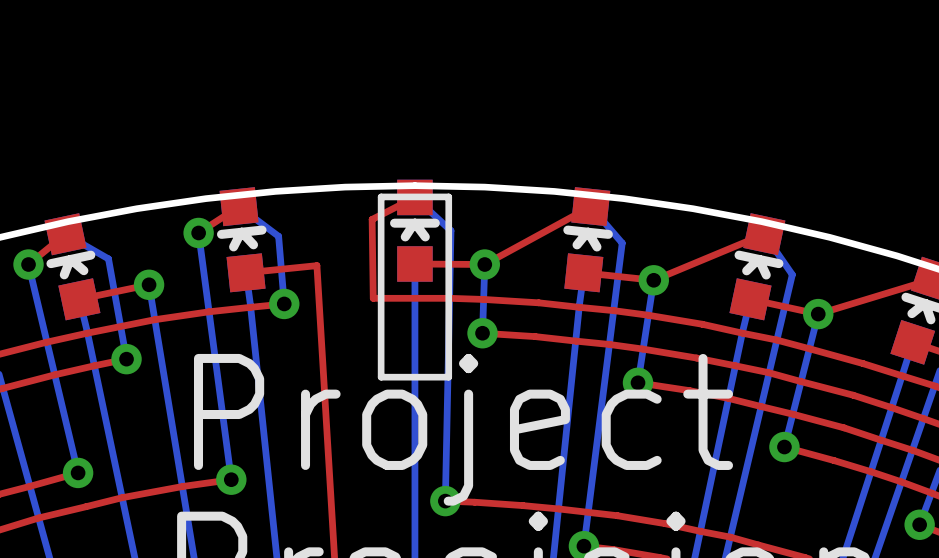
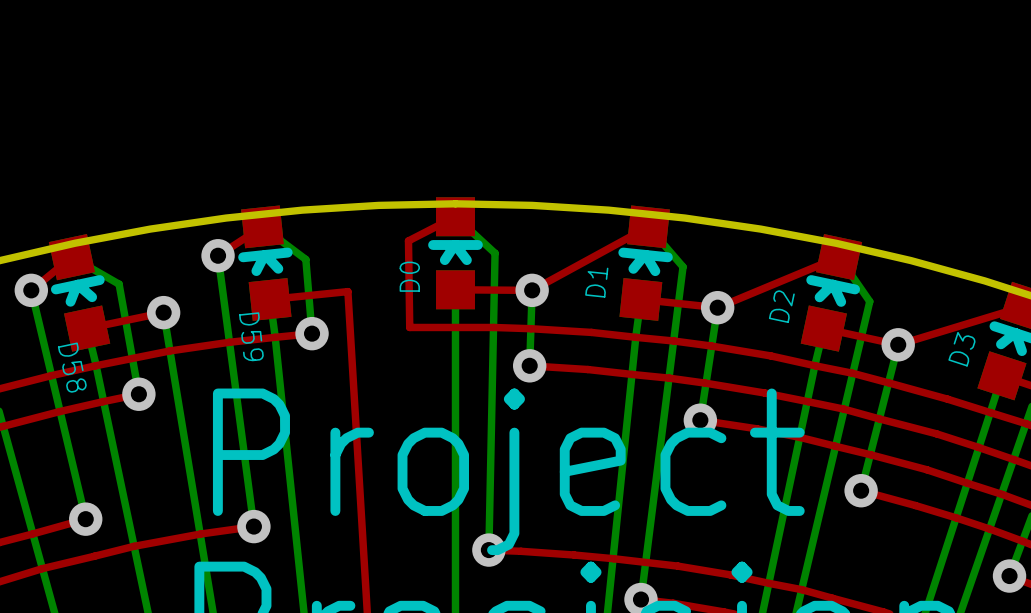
line: (381, 196) (448, 196) (448, 377) (381, 377) (381, 196) -> none
D0 name: none -> D0 (409, 276)
D1 name: none -> D1 (596, 282)
D2 name: none -> D2 (781, 306)
D59 name: none -> D59 (251, 336)
D3 name: none -> D3 (961, 349)
D58 name: none -> D58 (72, 367)

